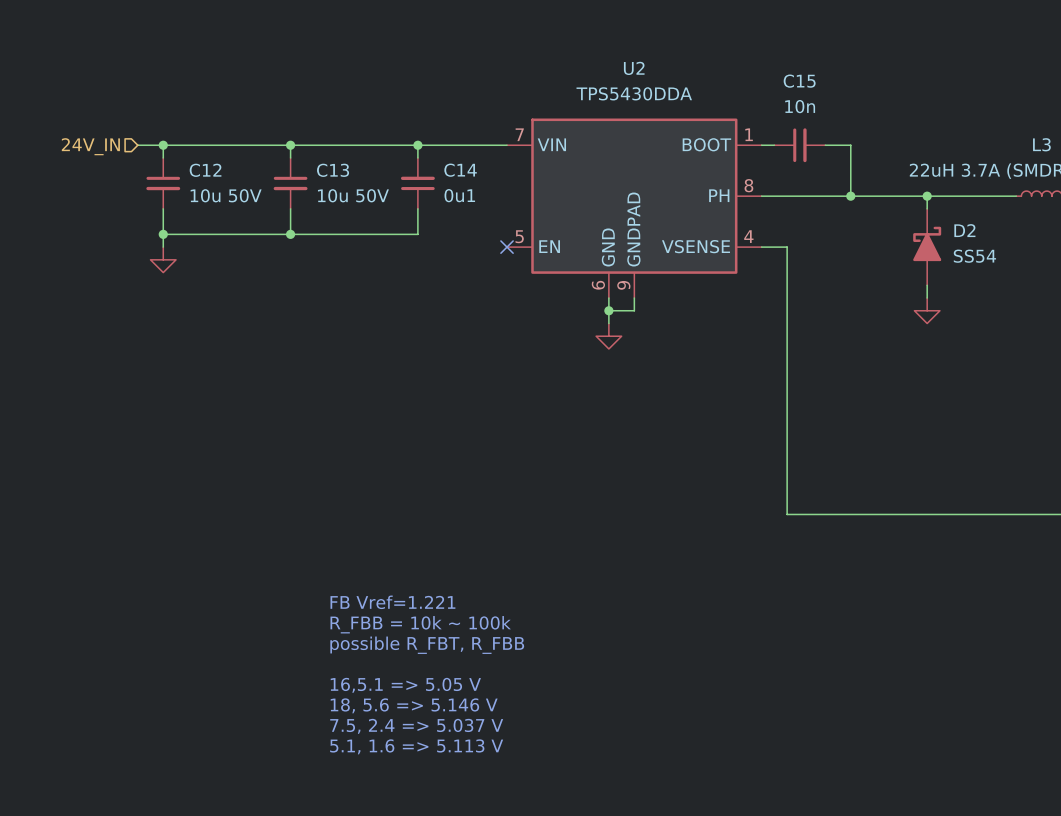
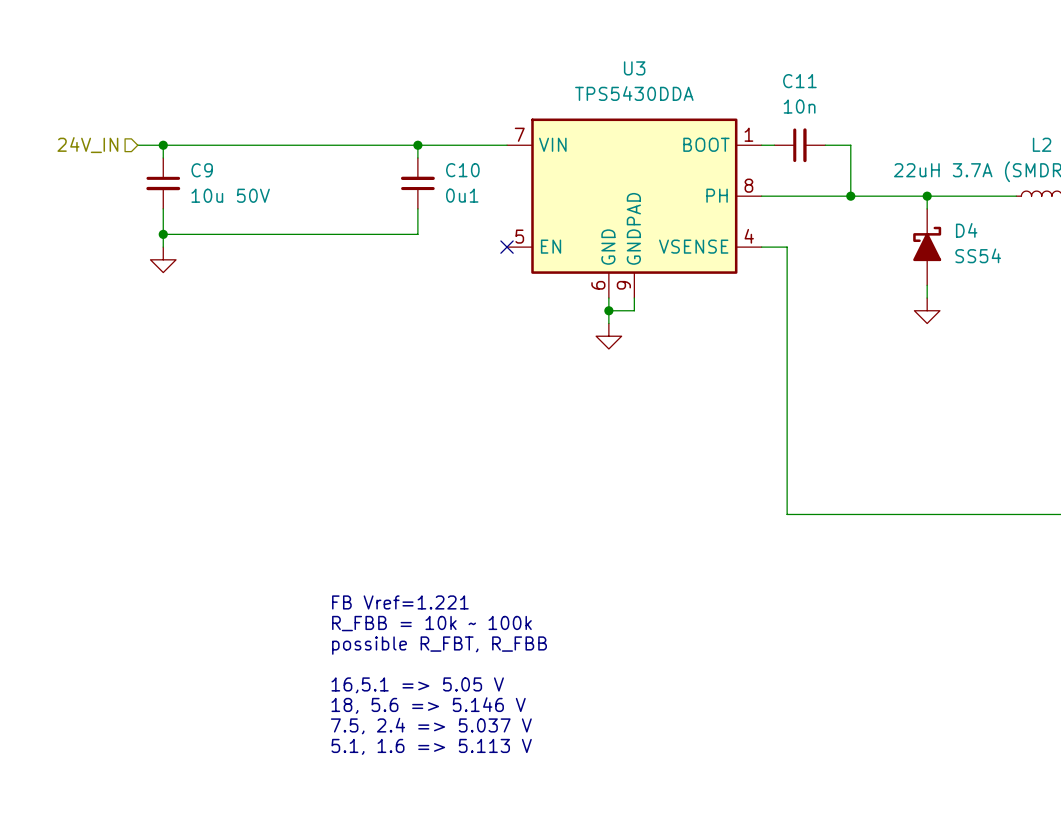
U2 name: U2 (634, 68) -> U3 (634, 68)
C15 name: C15 (799, 81) -> C11 (799, 81)
L3 name: L3 (1041, 144) -> L2 (1042, 144)
wire: (290, 145) (290, 157) -> none
junction: (290, 145) -> none
C12 name: C12 (205, 170) -> C9 (202, 170)
C14 name: C14 (460, 170) -> C10 (462, 170)
C13: 10u 50V (290, 183) -> none
wire: (290, 208) (290, 234) -> none
D2 name: D2 (964, 230) -> D4 (966, 230)
junction: (290, 234) -> none

